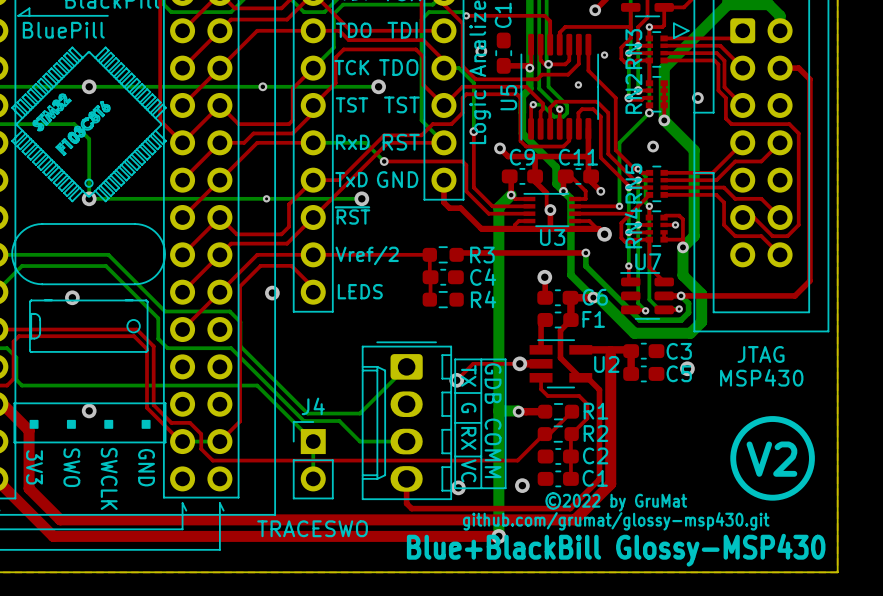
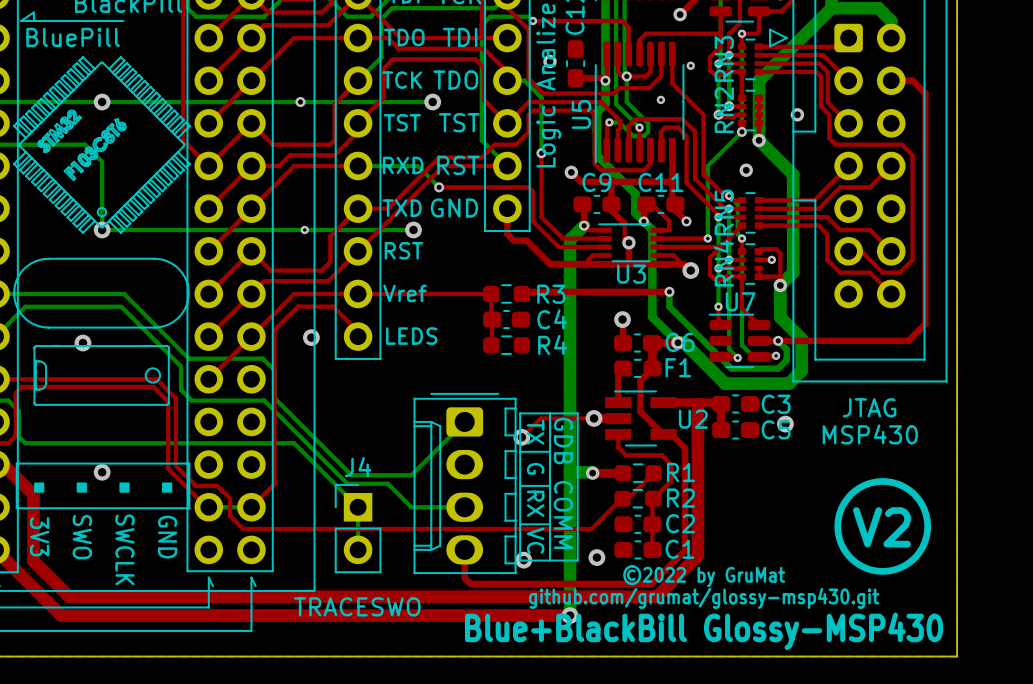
text: RxD (352, 142) -> RXD (403, 165)
text: TxD (351, 179) -> TXD (402, 208)
text: ~{RST} (352, 215) -> RST (403, 250)
text: Vref/2 (367, 255) -> Vref (404, 293)

